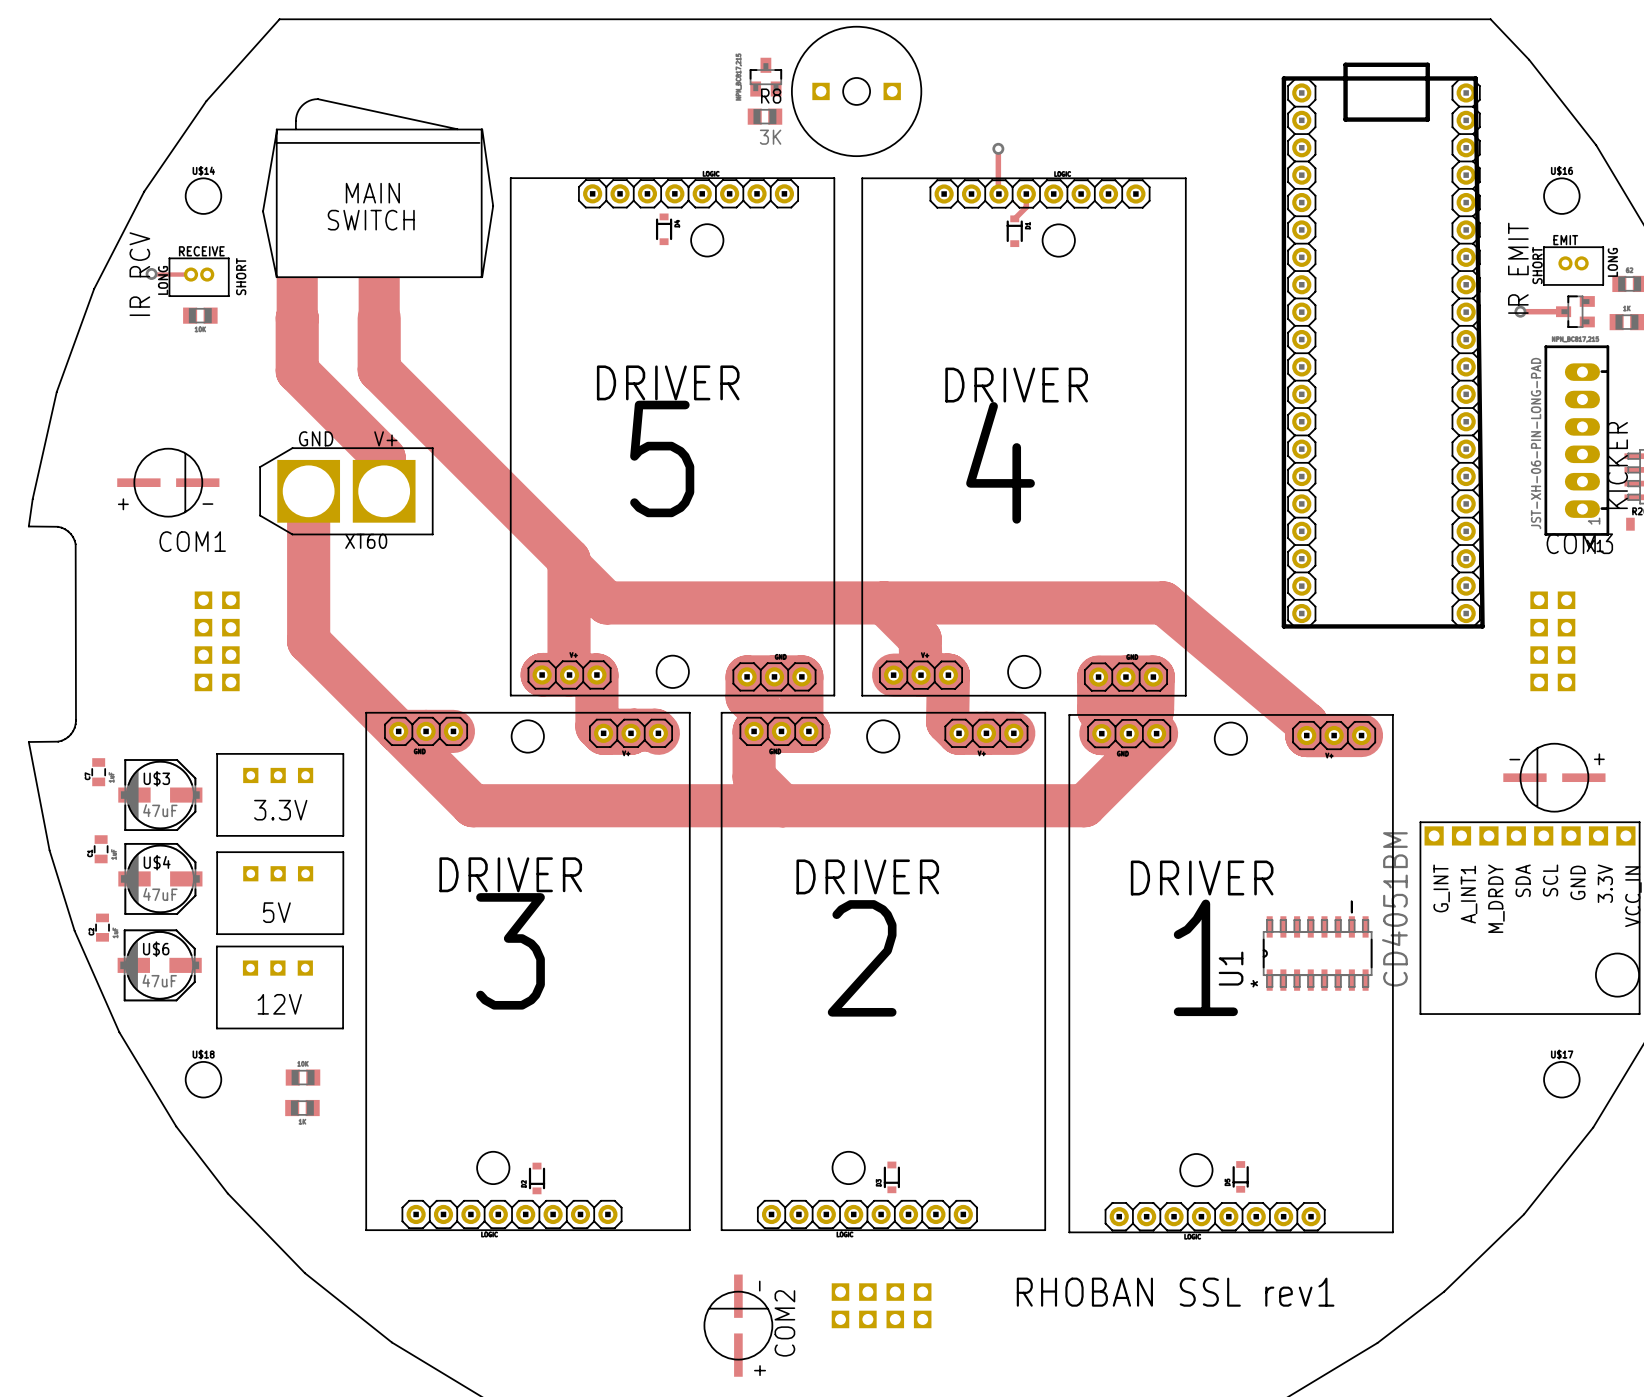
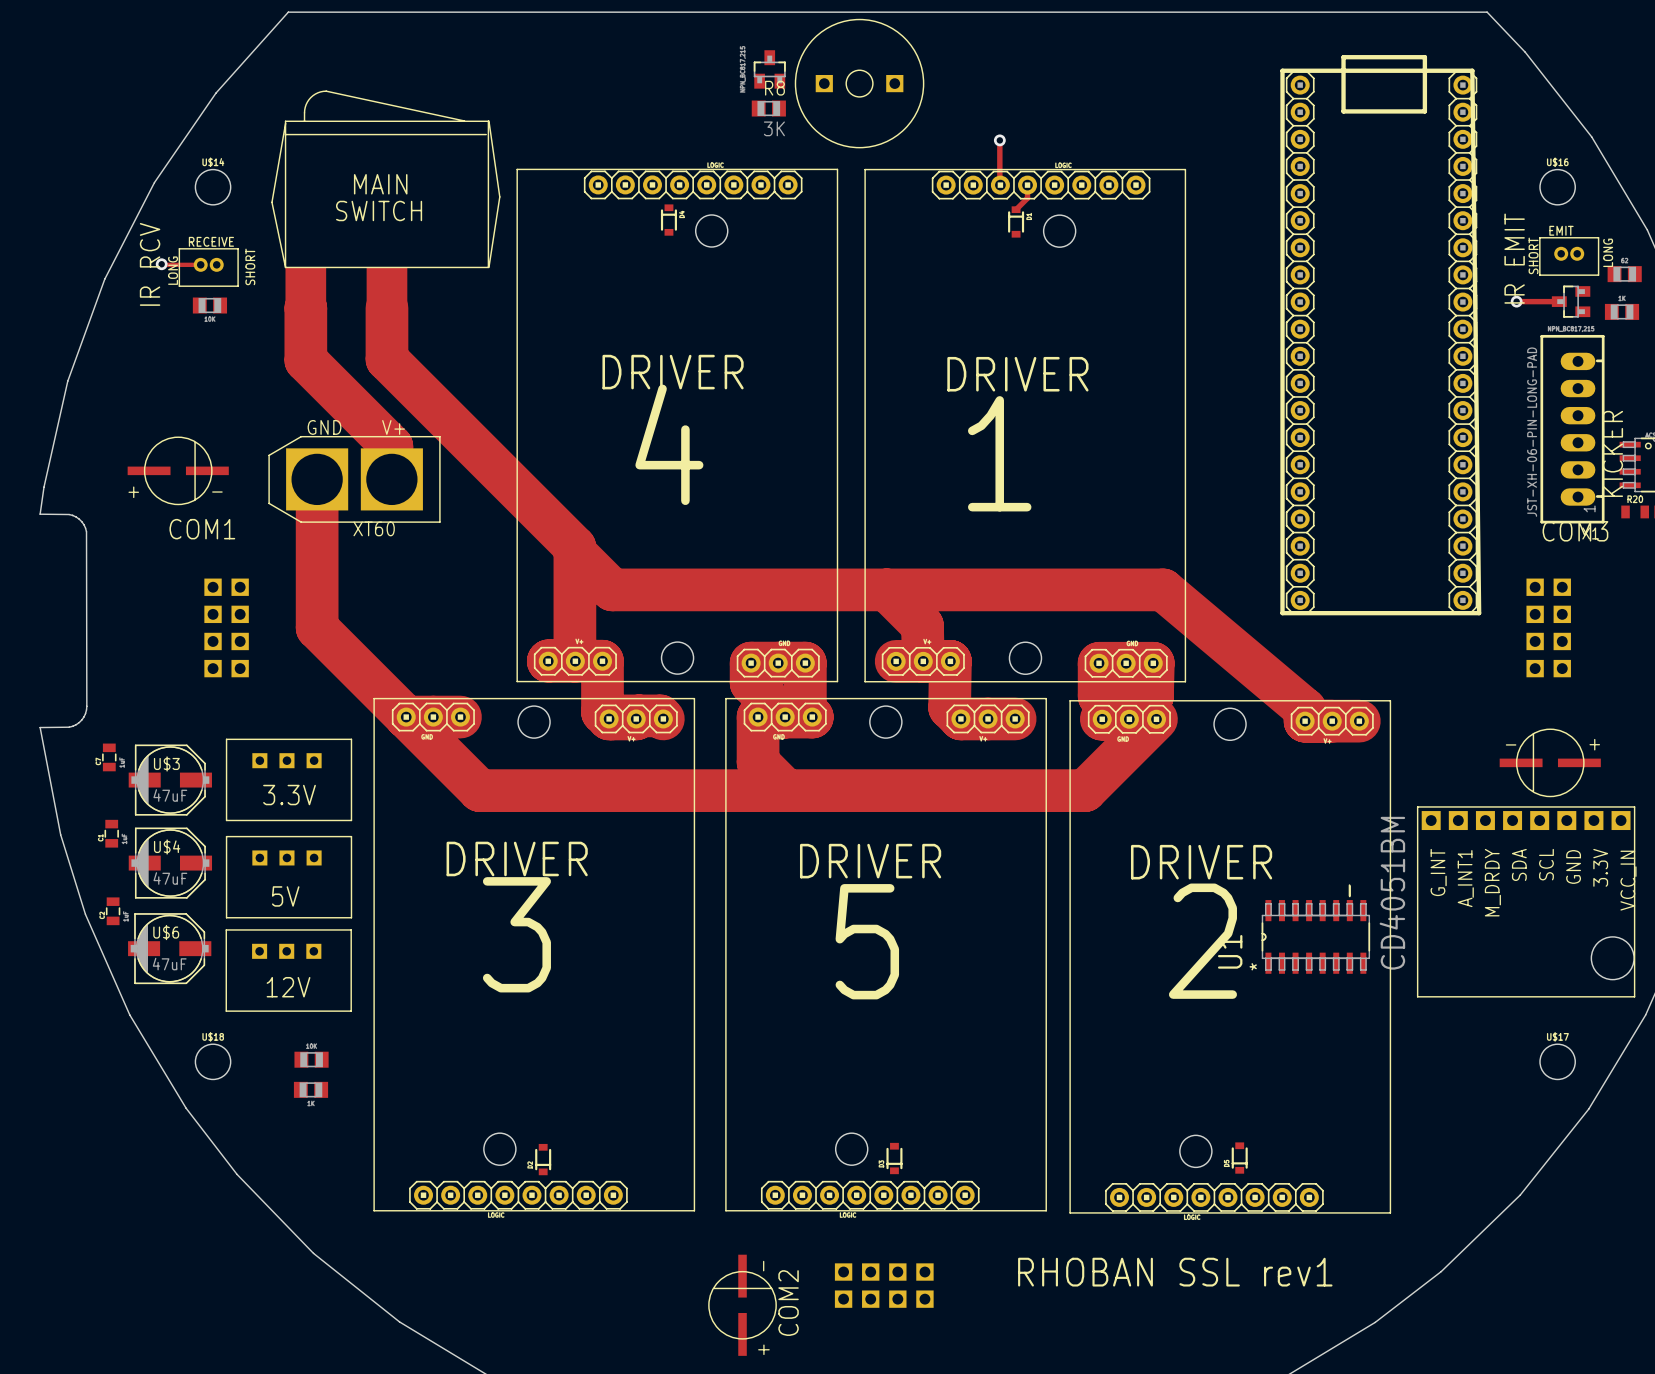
text: 5 (662, 458) -> 4 (669, 444)
text: 4 (1000, 462) -> 1 (999, 453)
text: 1 (1205, 957) -> 2 (1202, 941)
text: 2 (862, 958) -> 5 (867, 941)

